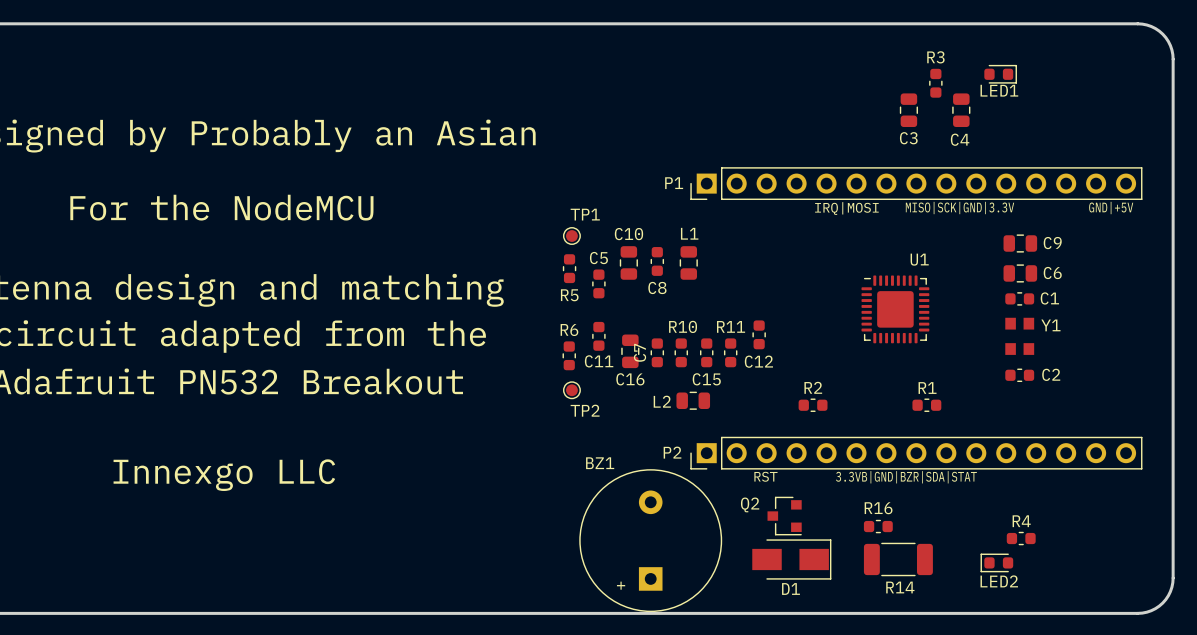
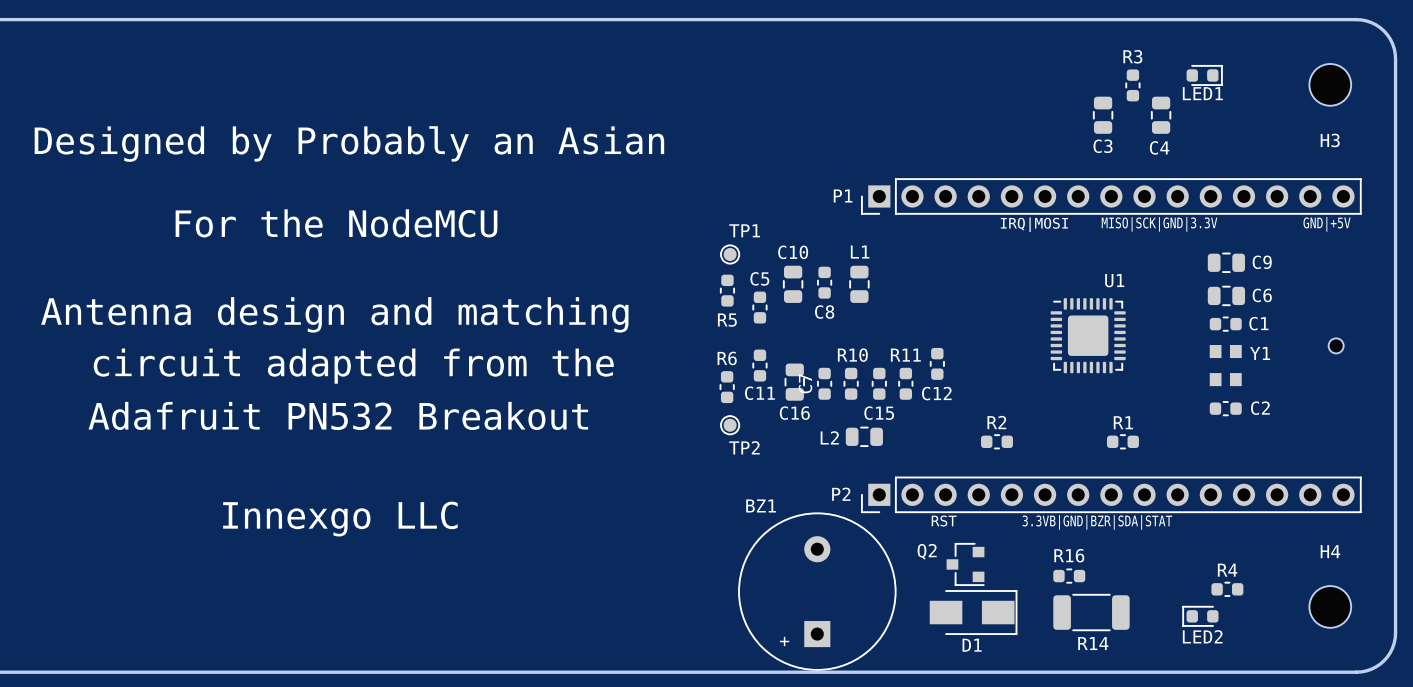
H3: none -> (1330, 84)
part: none -> (1336, 345)
H4: none -> (1330, 606)

